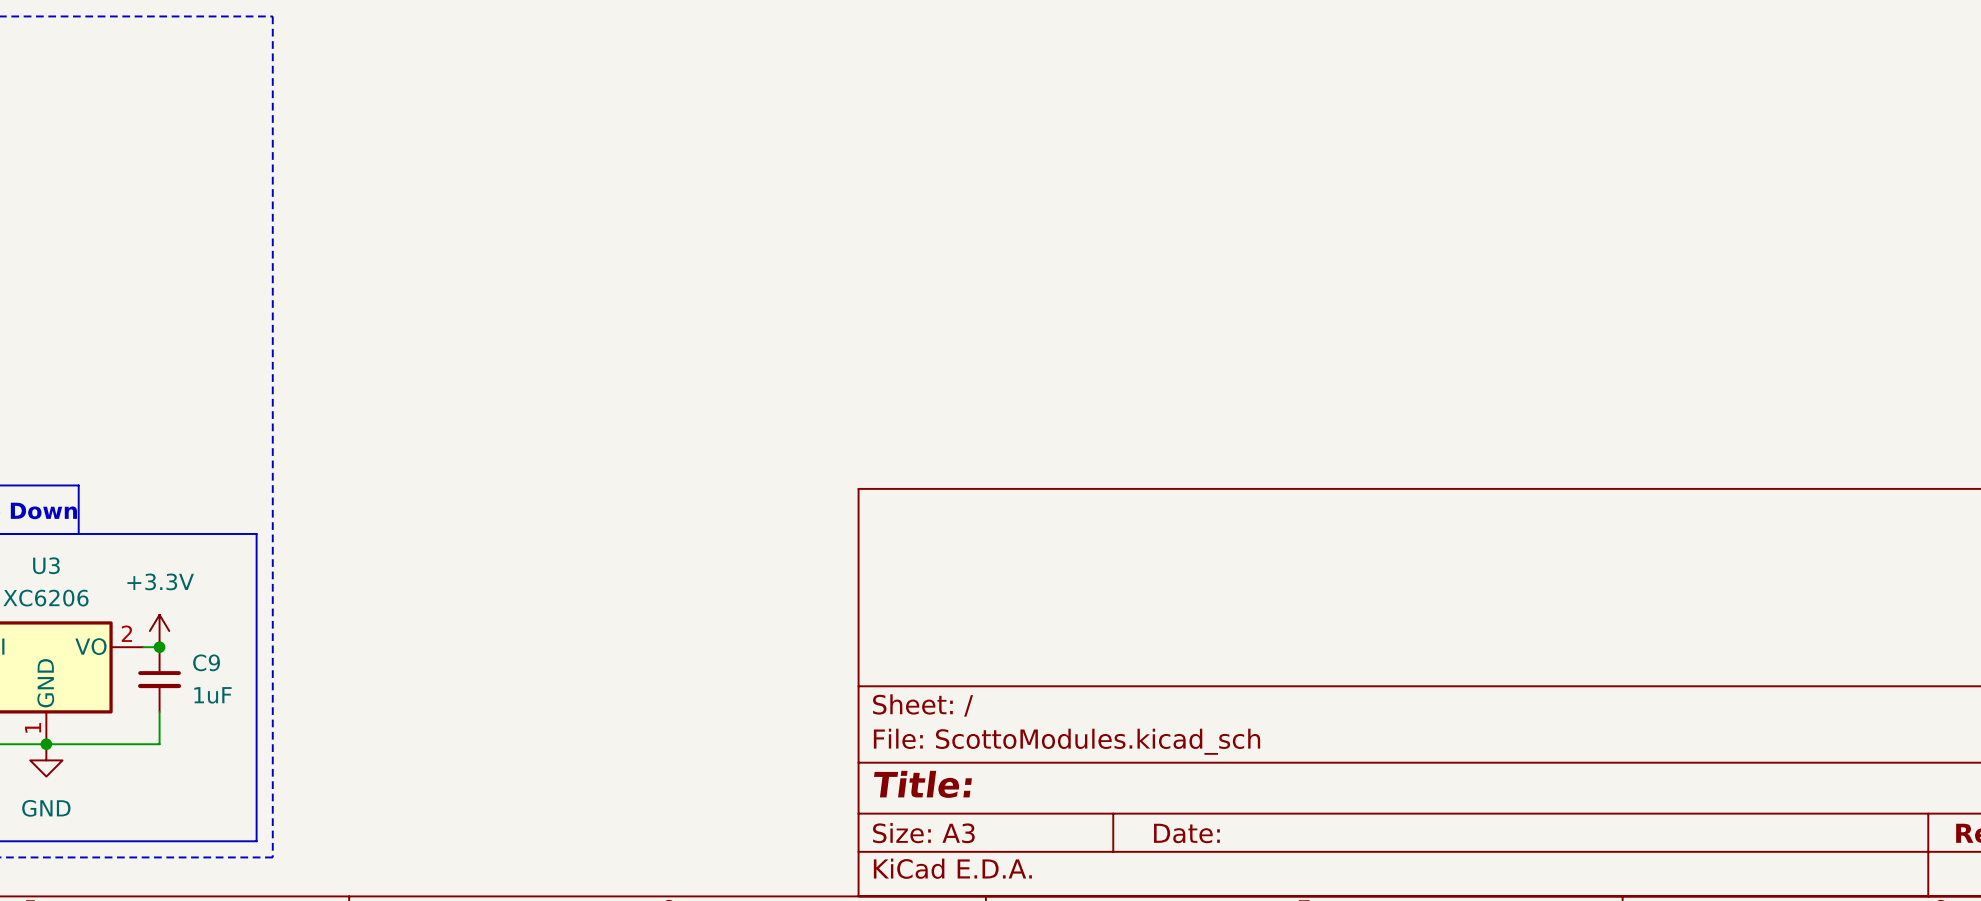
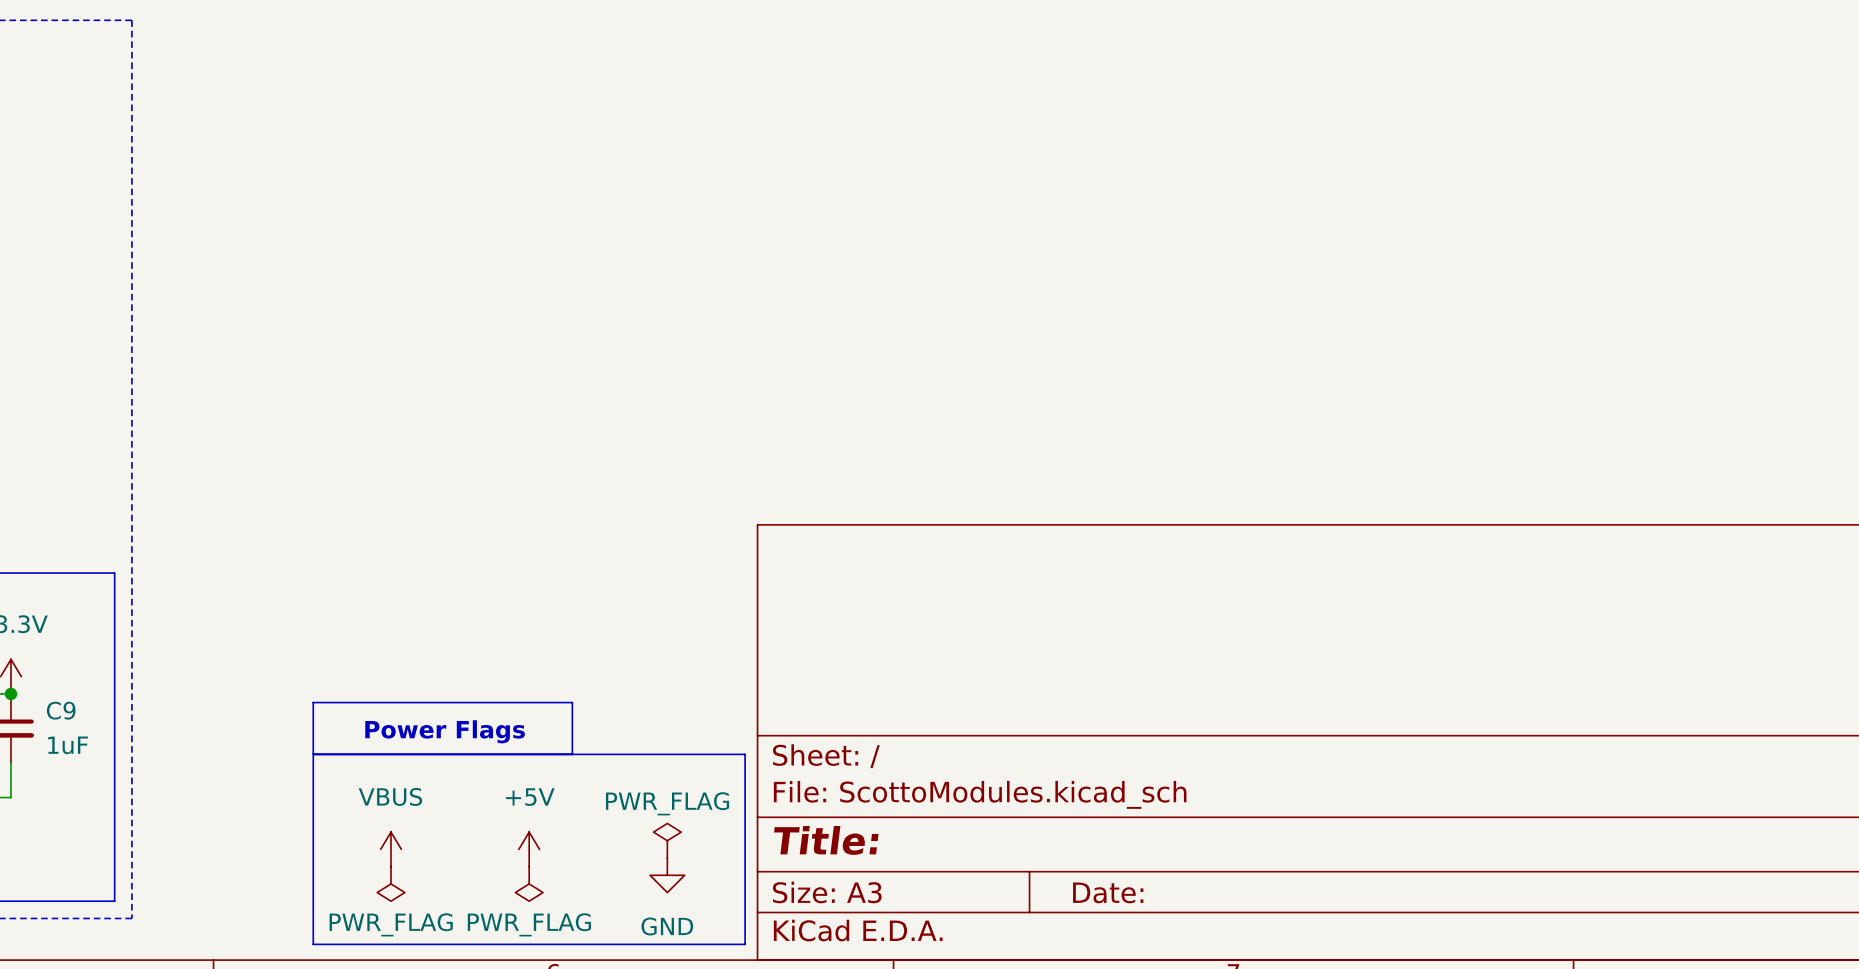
text: none -> Power Flags (445, 731)
line: none -> (313, 754) (745, 754) (745, 944) (313, 944) (313, 702) (572, 702) (572, 754)
power symbol: none -> PWR_FLAG (667, 840)
power symbol: none -> VBUS (391, 849)
power symbol: none -> +5V (529, 849)
power symbol: none -> GND (667, 875)
power symbol: none -> PWR_FLAG (391, 883)
power symbol: none -> PWR_FLAG (529, 883)

